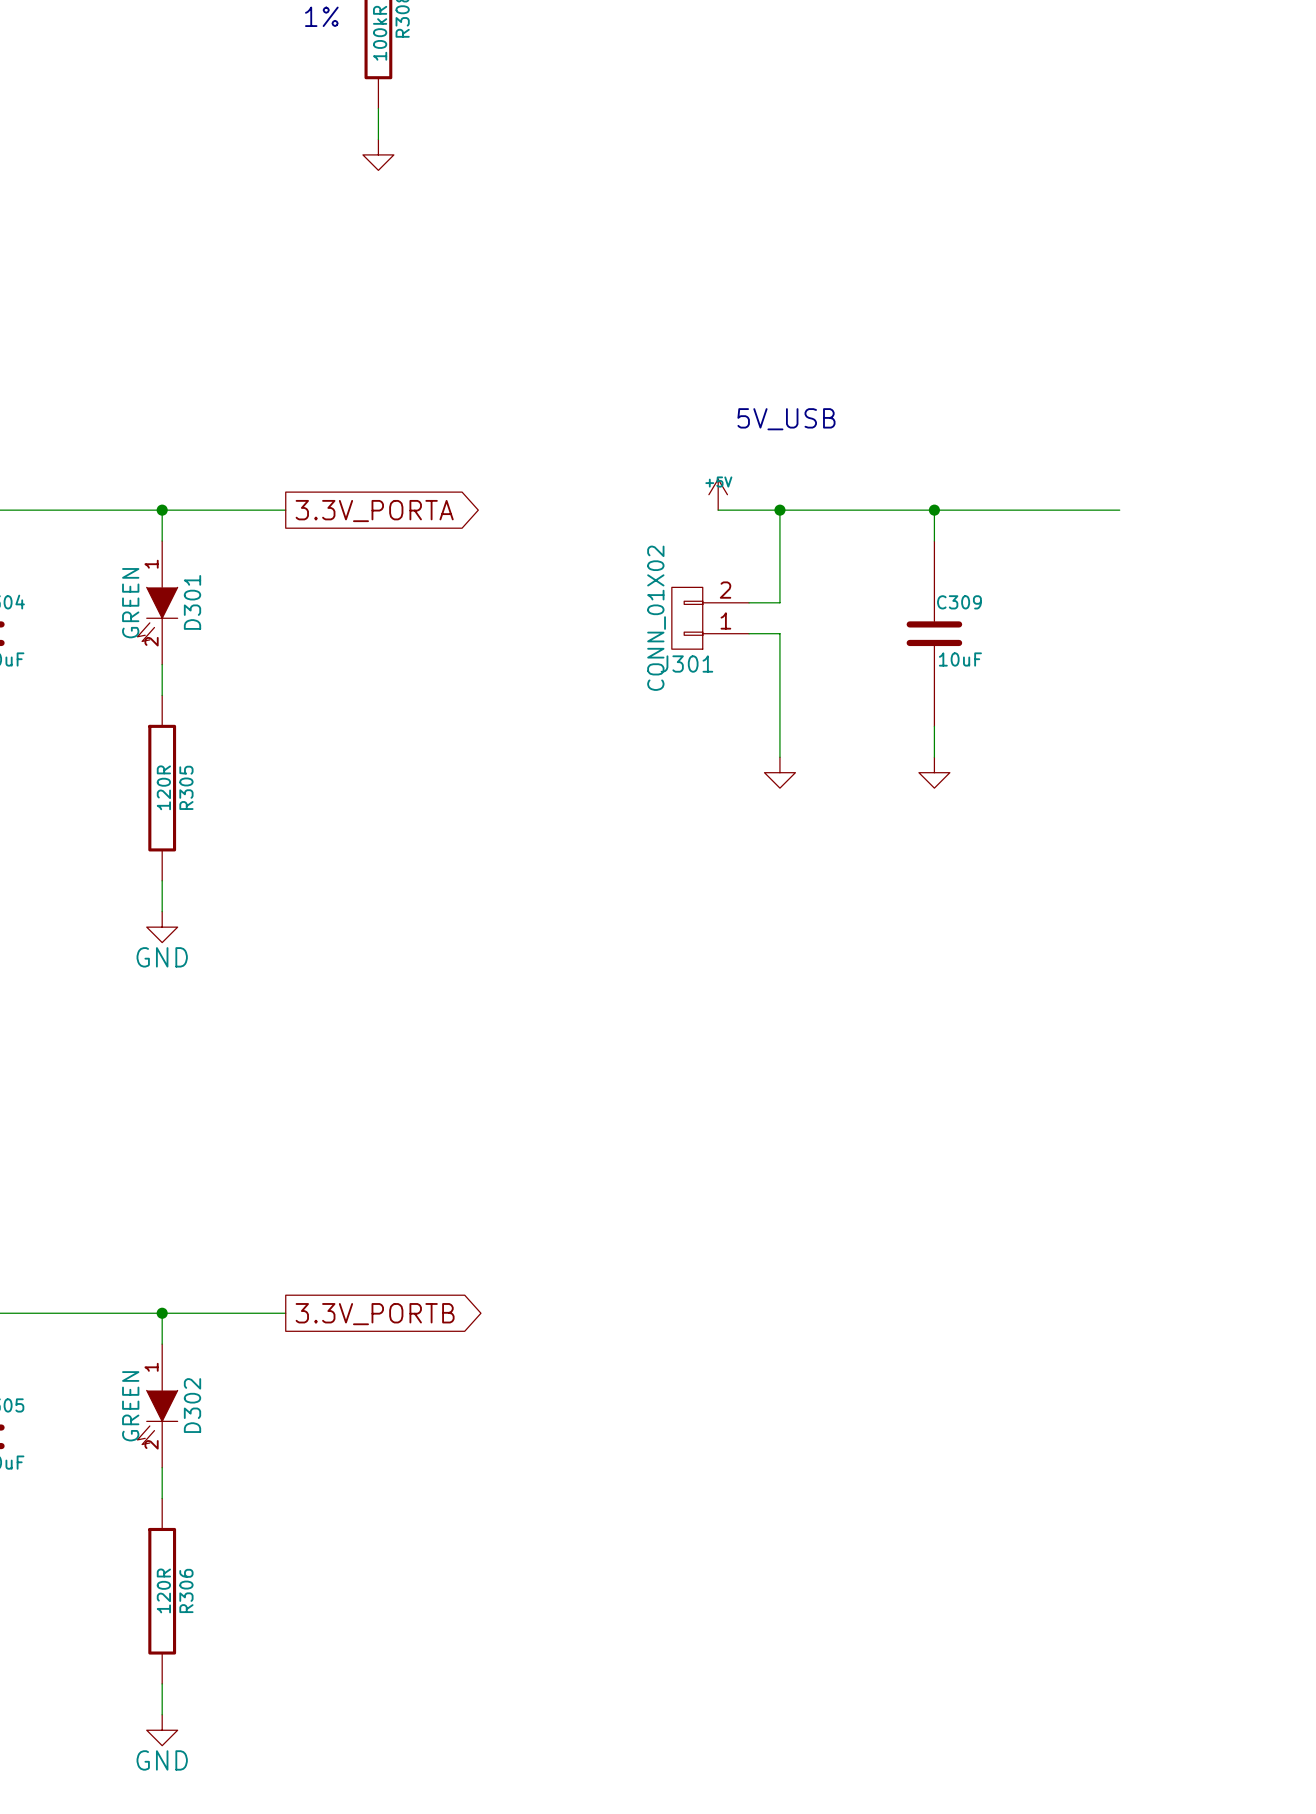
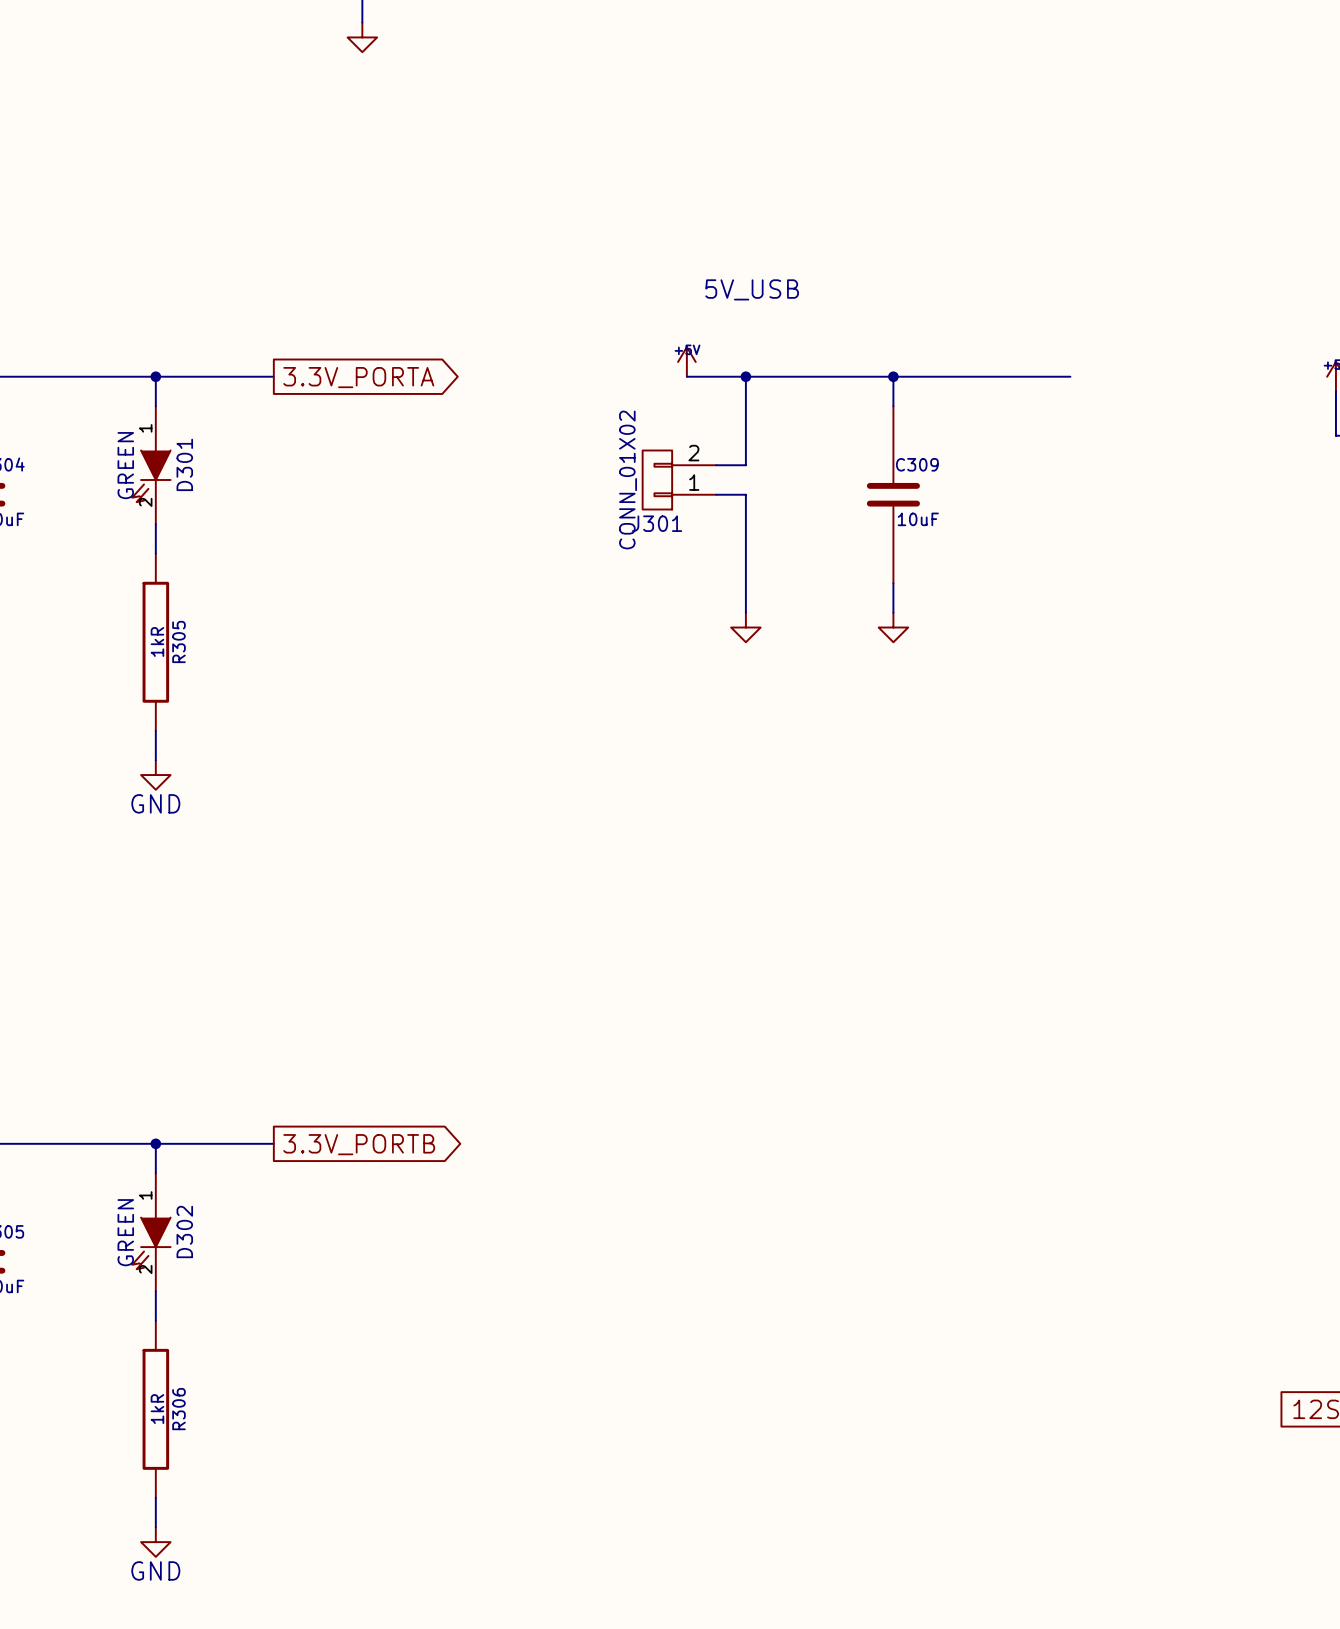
R305 value: 120R (163, 787) -> 1kR (157, 641)
R306 value: 120R (163, 1590) -> 1kR (157, 1409)

